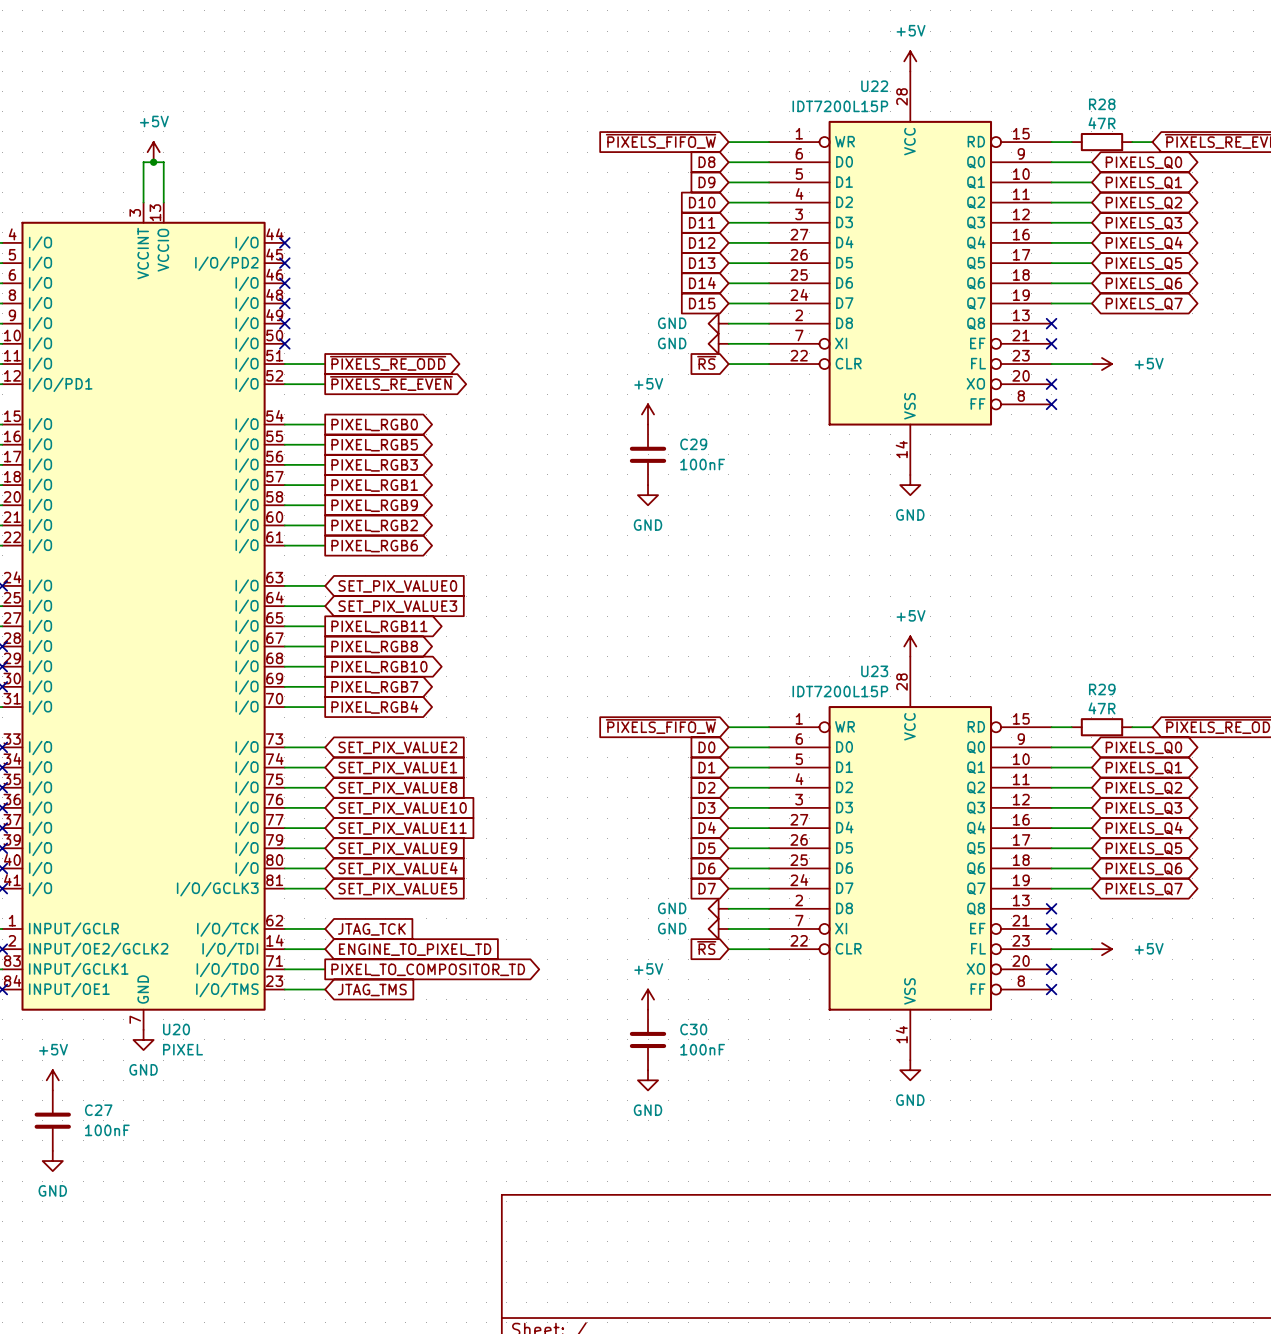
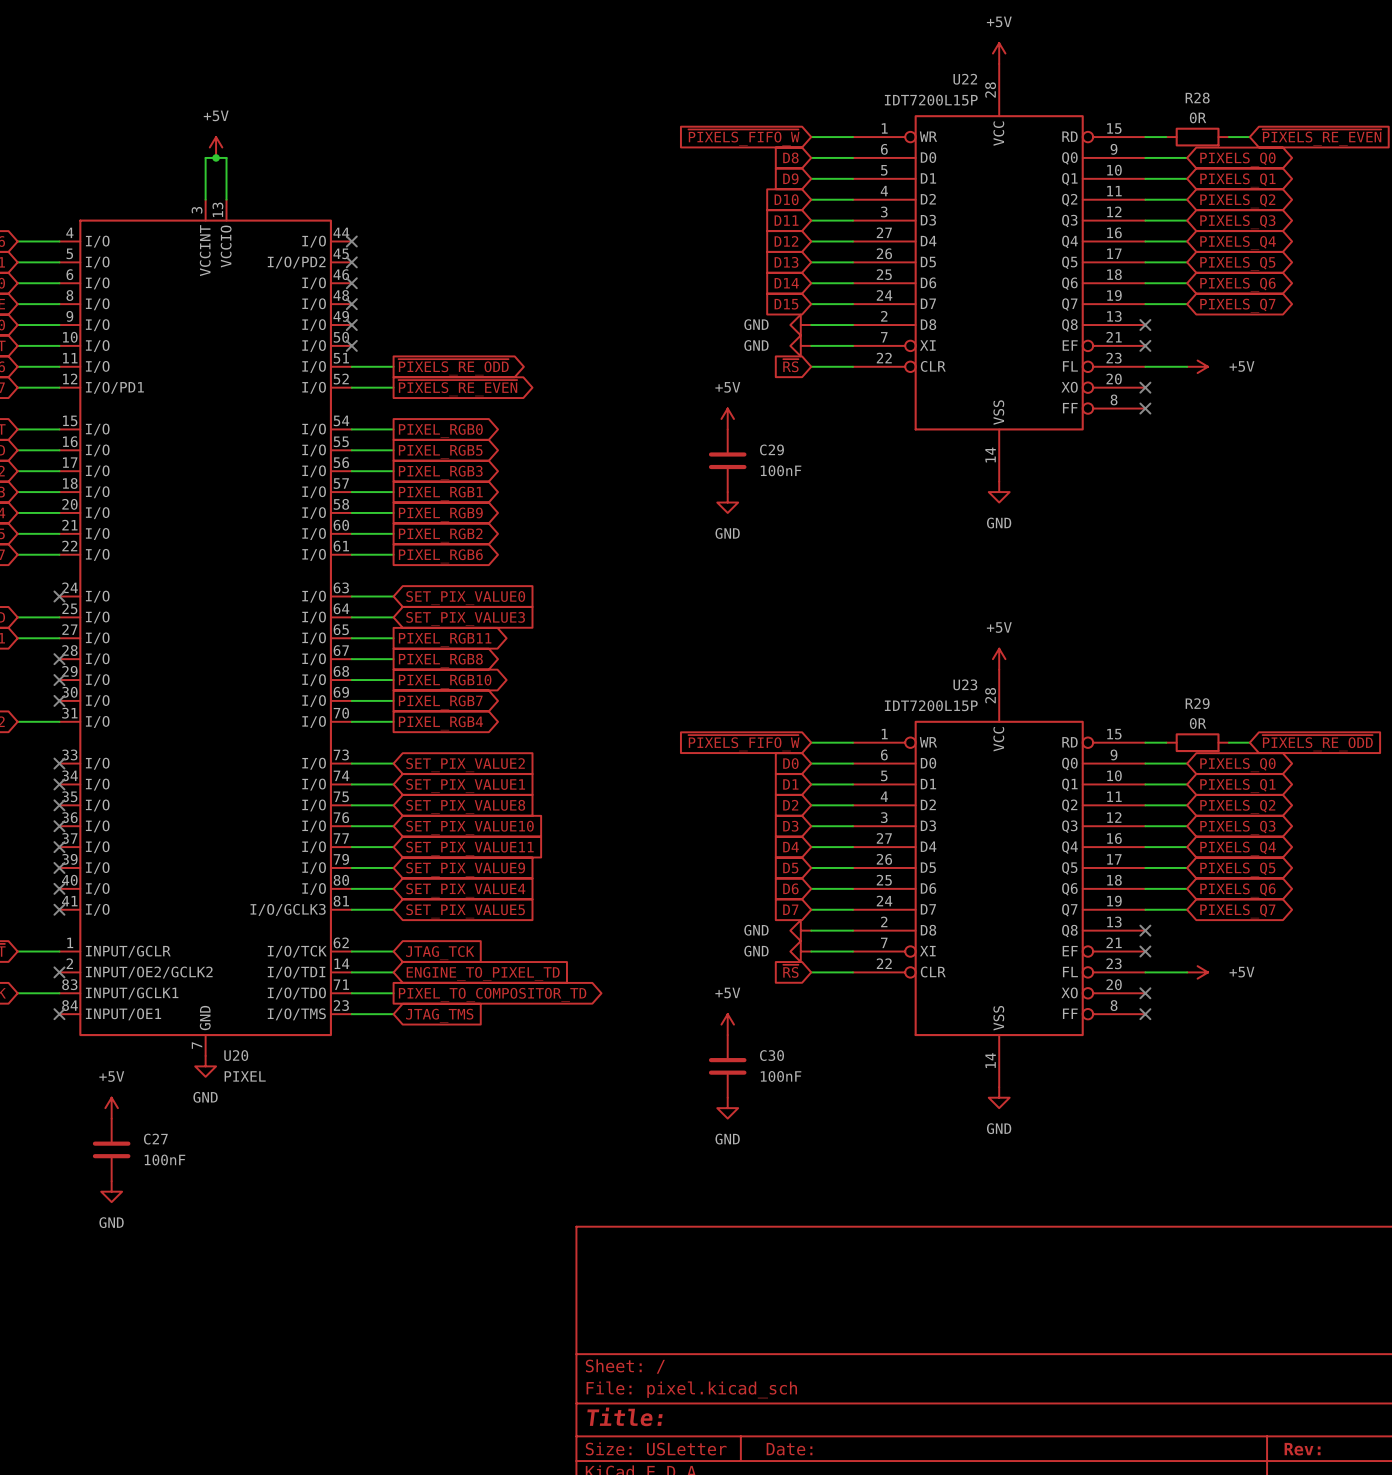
R28 value: 47R (1102, 123) -> 0R (1198, 117)
R29 value: 47R (1102, 708) -> 0R (1198, 723)

